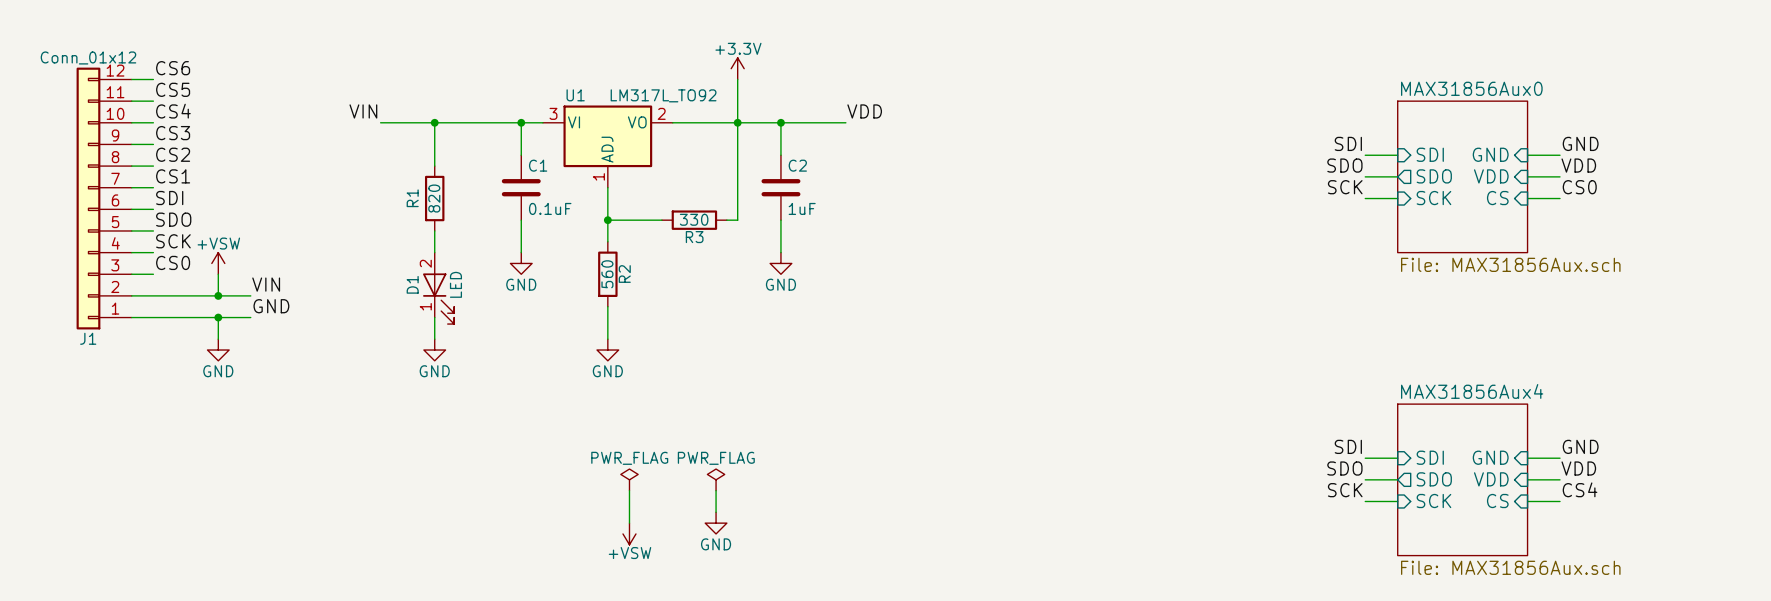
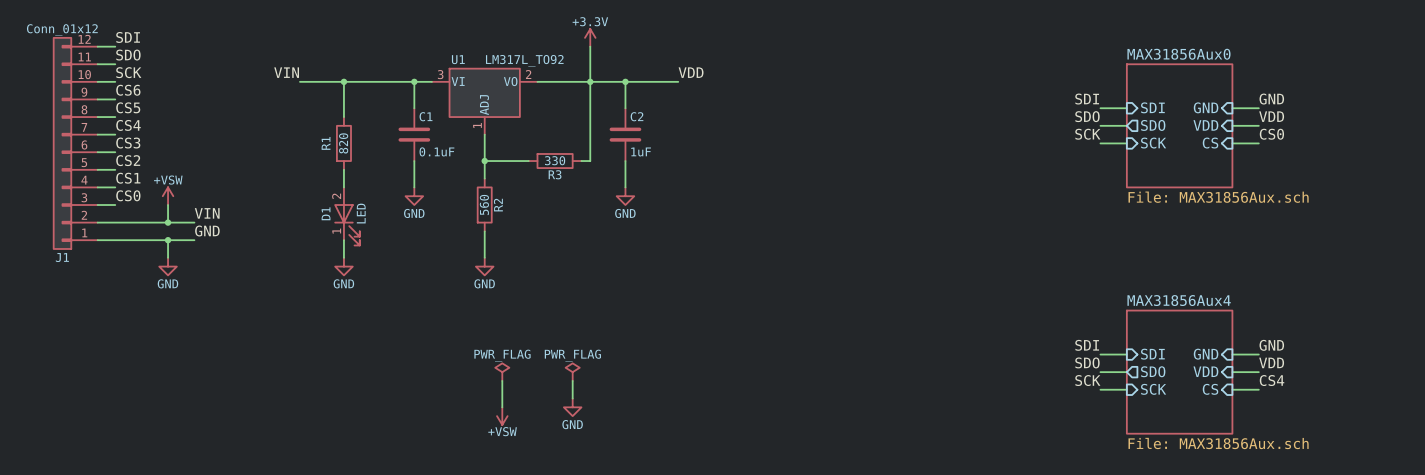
label: CS6 (173, 68) -> SDI (128, 37)
label: CS5 (173, 89) -> SDO (128, 55)
label: CS4 (173, 111) -> SCK (128, 72)
label: CS3 (173, 133) -> CS6 (128, 90)
label: CS2 (173, 154) -> CS5 (128, 107)
label: CS1 (173, 176) -> CS4 (128, 125)
label: SDI (169, 198) -> CS3 (128, 143)
label: SDO (173, 219) -> CS2 (128, 160)
label: SCK (173, 241) -> CS1 (128, 178)

